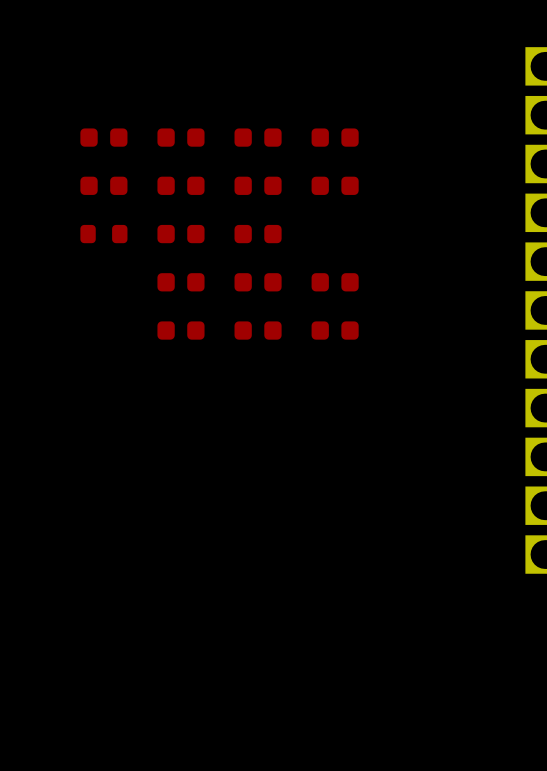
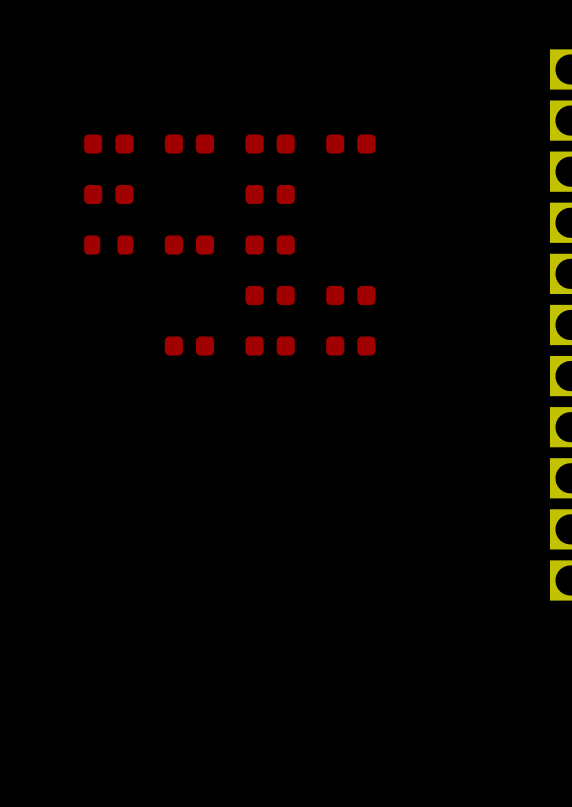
part: (180, 185) -> none
part: (335, 185) -> none
part: (180, 282) -> none

